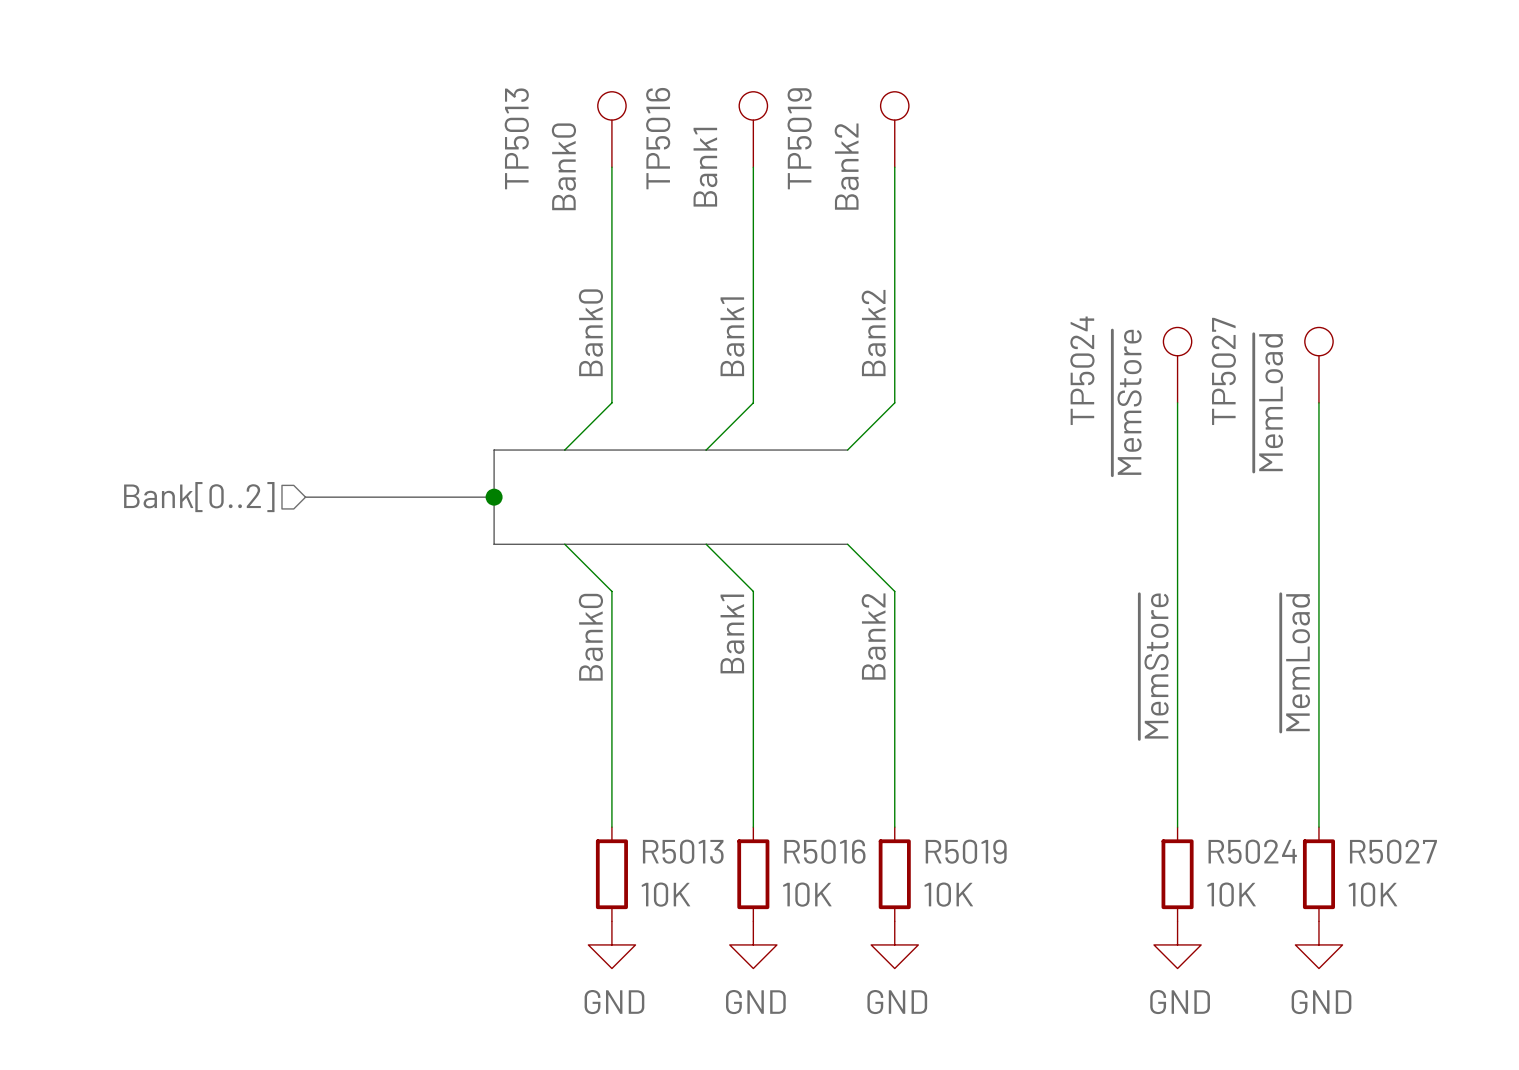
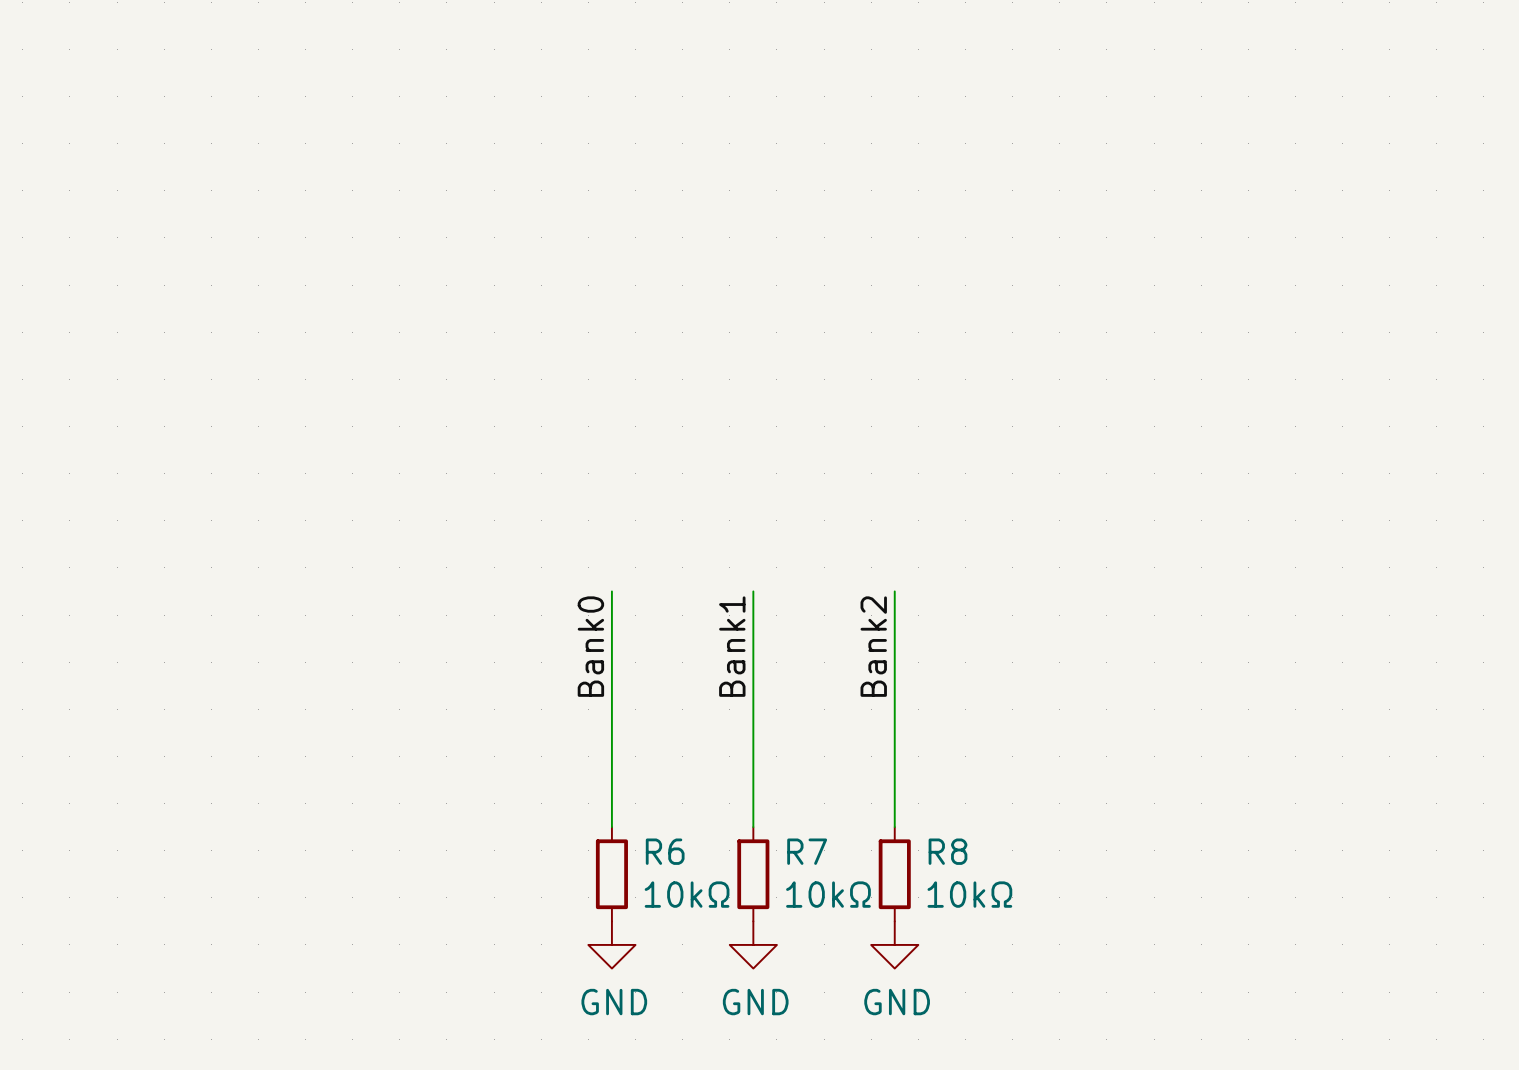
TP5013: Bank0 (611, 129) -> none
TP5016: Bank1 (753, 129) -> none
TP5019: Bank2 (894, 129) -> none
wire: (611, 167) (611, 402) (564, 450) -> none
wire: (753, 167) (753, 402) (706, 450) -> none
wire: (894, 167) (894, 402) (847, 450) -> none
label: Bank0 (590, 332) -> none
label: Bank2 (873, 333) -> none
label: Bank1 (732, 336) -> none
TP5024: ~{MemStore} (1177, 365) -> none
TP5027: ~{MemLoad} (1318, 365) -> none
wire: (1177, 402) (1177, 827) -> none
wire: (1318, 402) (1318, 827) -> none
bus: (847, 450) (494, 450) (494, 544) (847, 544) -> none
hierarchical label: Bank[0..2] (199, 497) -> none
bus: (305, 497) (494, 497) -> none
junction: (494, 497) -> none
wire: (564, 544) (611, 591) -> none
wire: (706, 544) (753, 591) -> none
wire: (847, 544) (894, 591) -> none
label: ~{MemLoad} (1295, 662) -> none
label: ~{MemStore} (1153, 666) -> none
R5013 name: R5013 (683, 851) -> R6 (665, 851)
R5016 name: R5016 (824, 851) -> R7 (807, 851)
R5019 name: R5019 (966, 851) -> R8 (947, 851)
R5024: 10K (1177, 874) -> none
R5027: 10K (1318, 874) -> none
R5013 value: 10K (665, 894) -> 10kΩ (687, 894)
R5016 value: 10K (807, 894) -> 10kΩ (828, 894)
R5019 value: 10K (948, 894) -> 10kΩ (969, 894)
power symbol: GND (1177, 944) -> none
power symbol: GND (1318, 944) -> none

